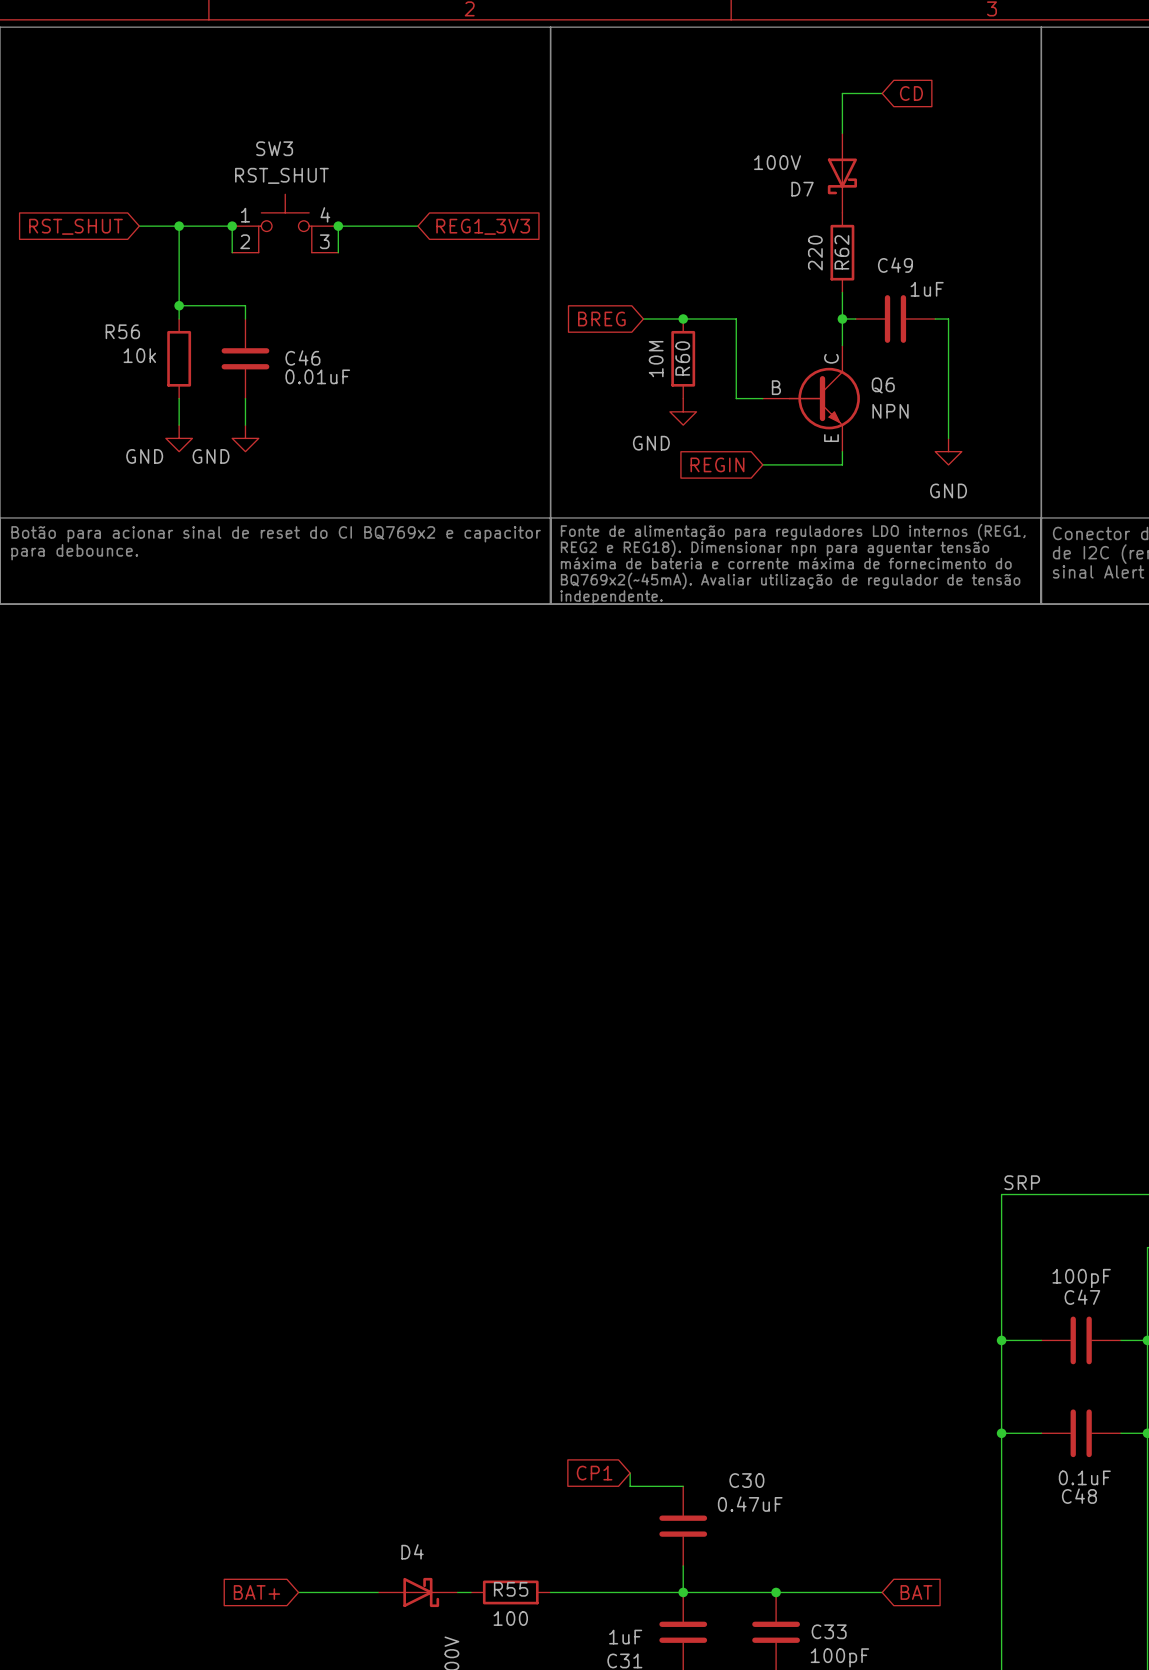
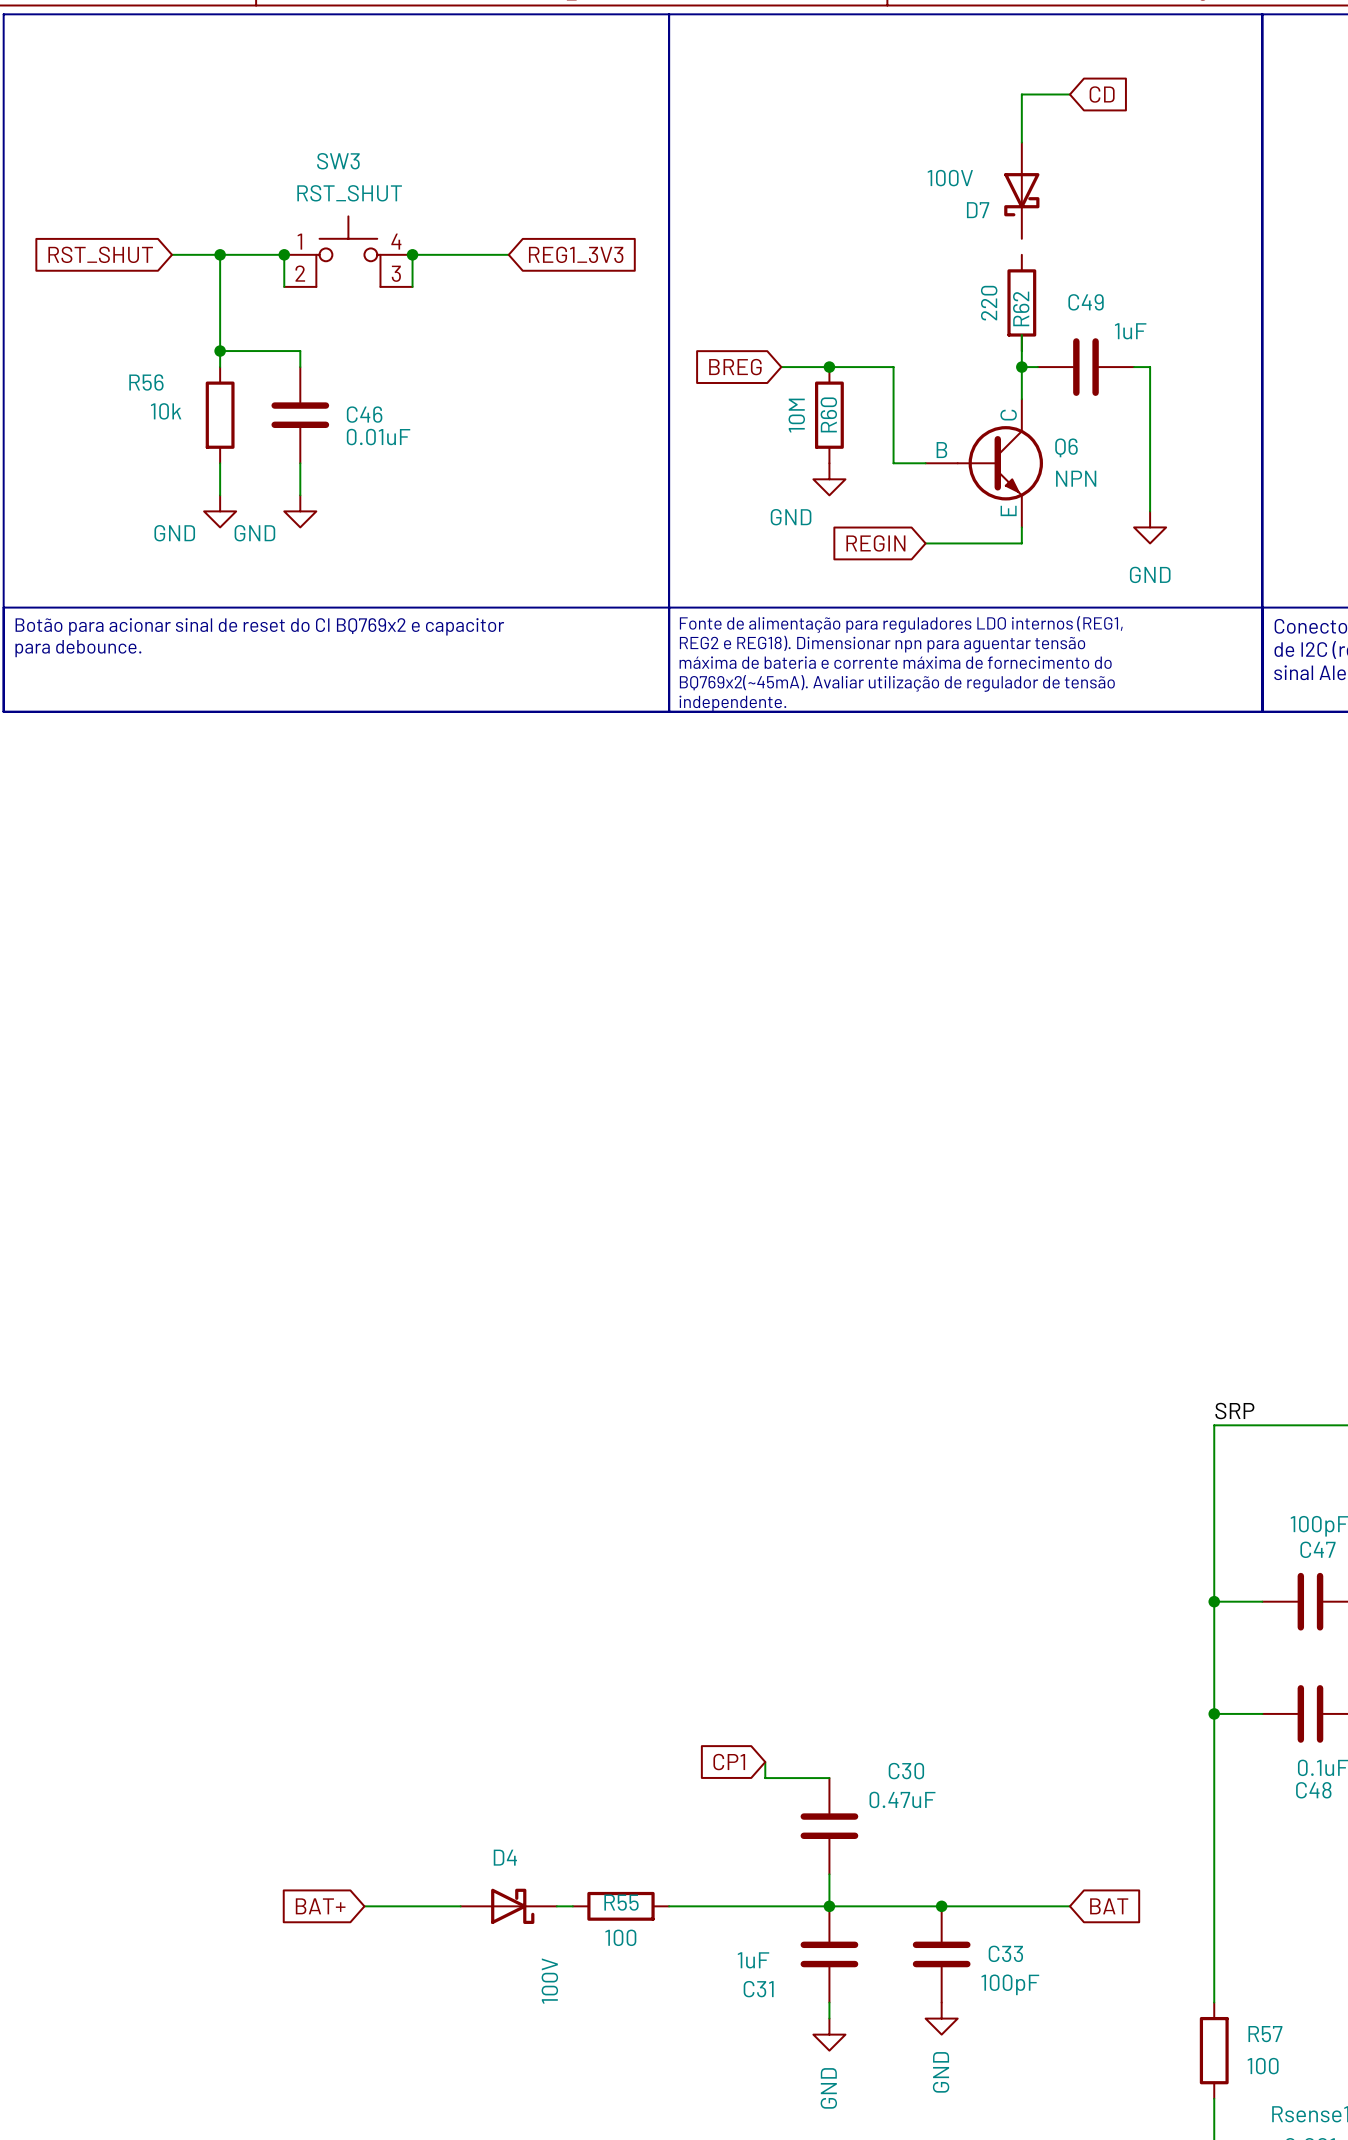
R62 name position: R62 (841, 252) -> R62 (1021, 308)
R62 position: (842, 252) -> (1021, 302)

